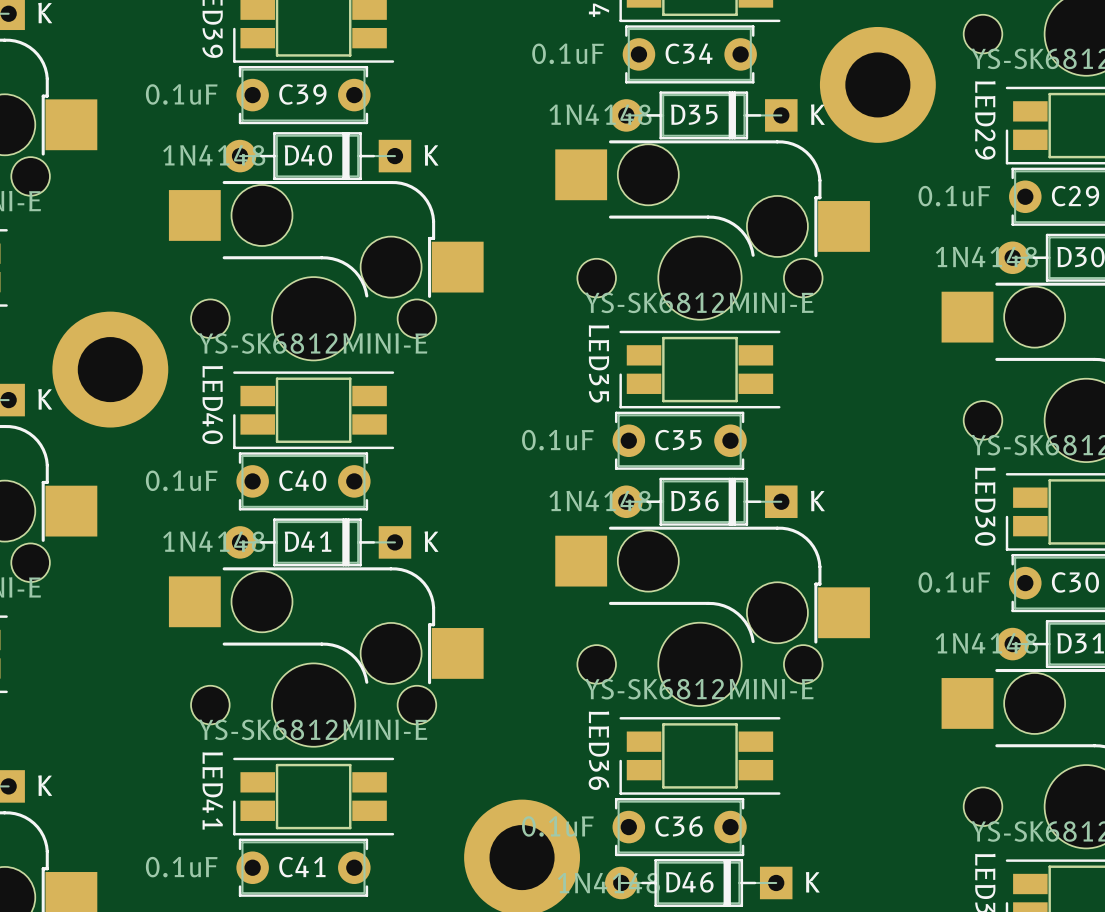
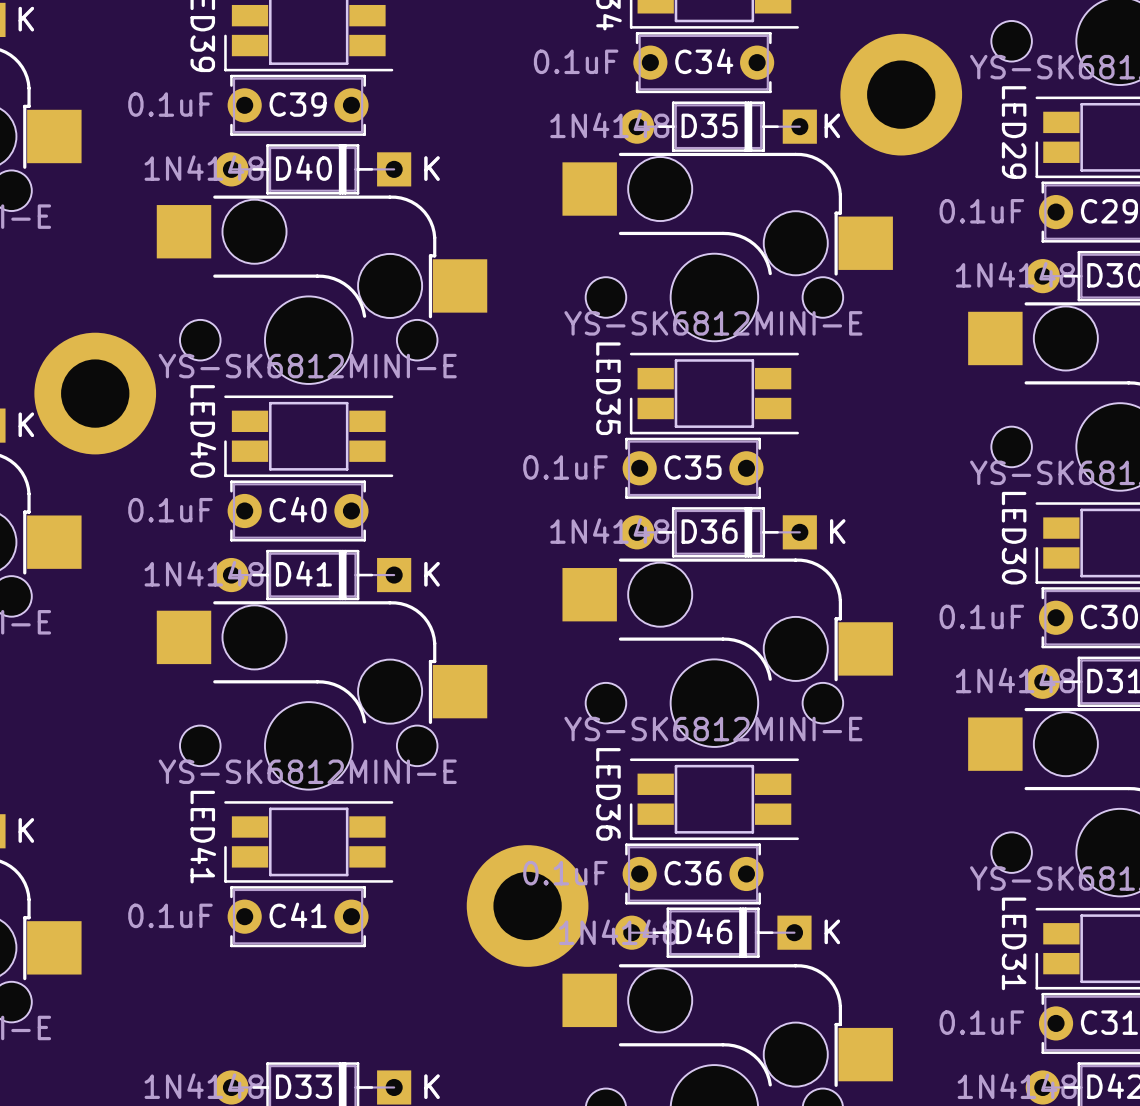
D35 footprint: [610, 91, 798, 140] -> [620, 101, 817, 152]

